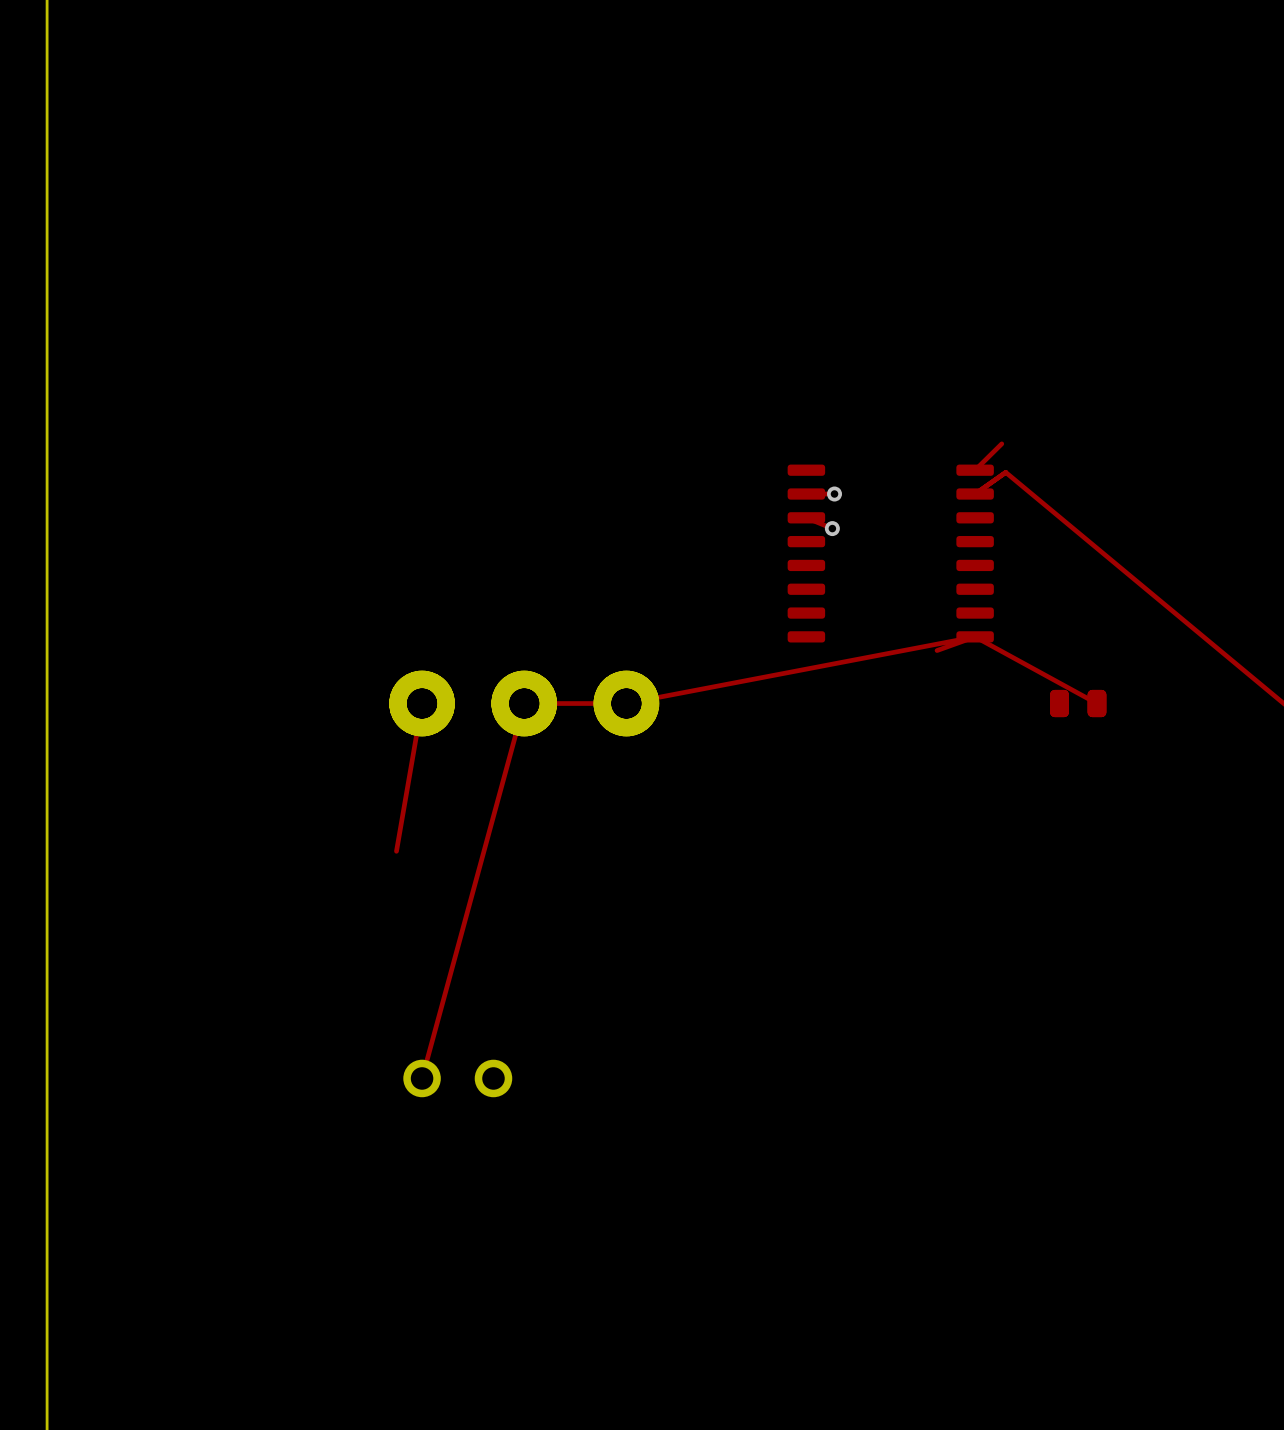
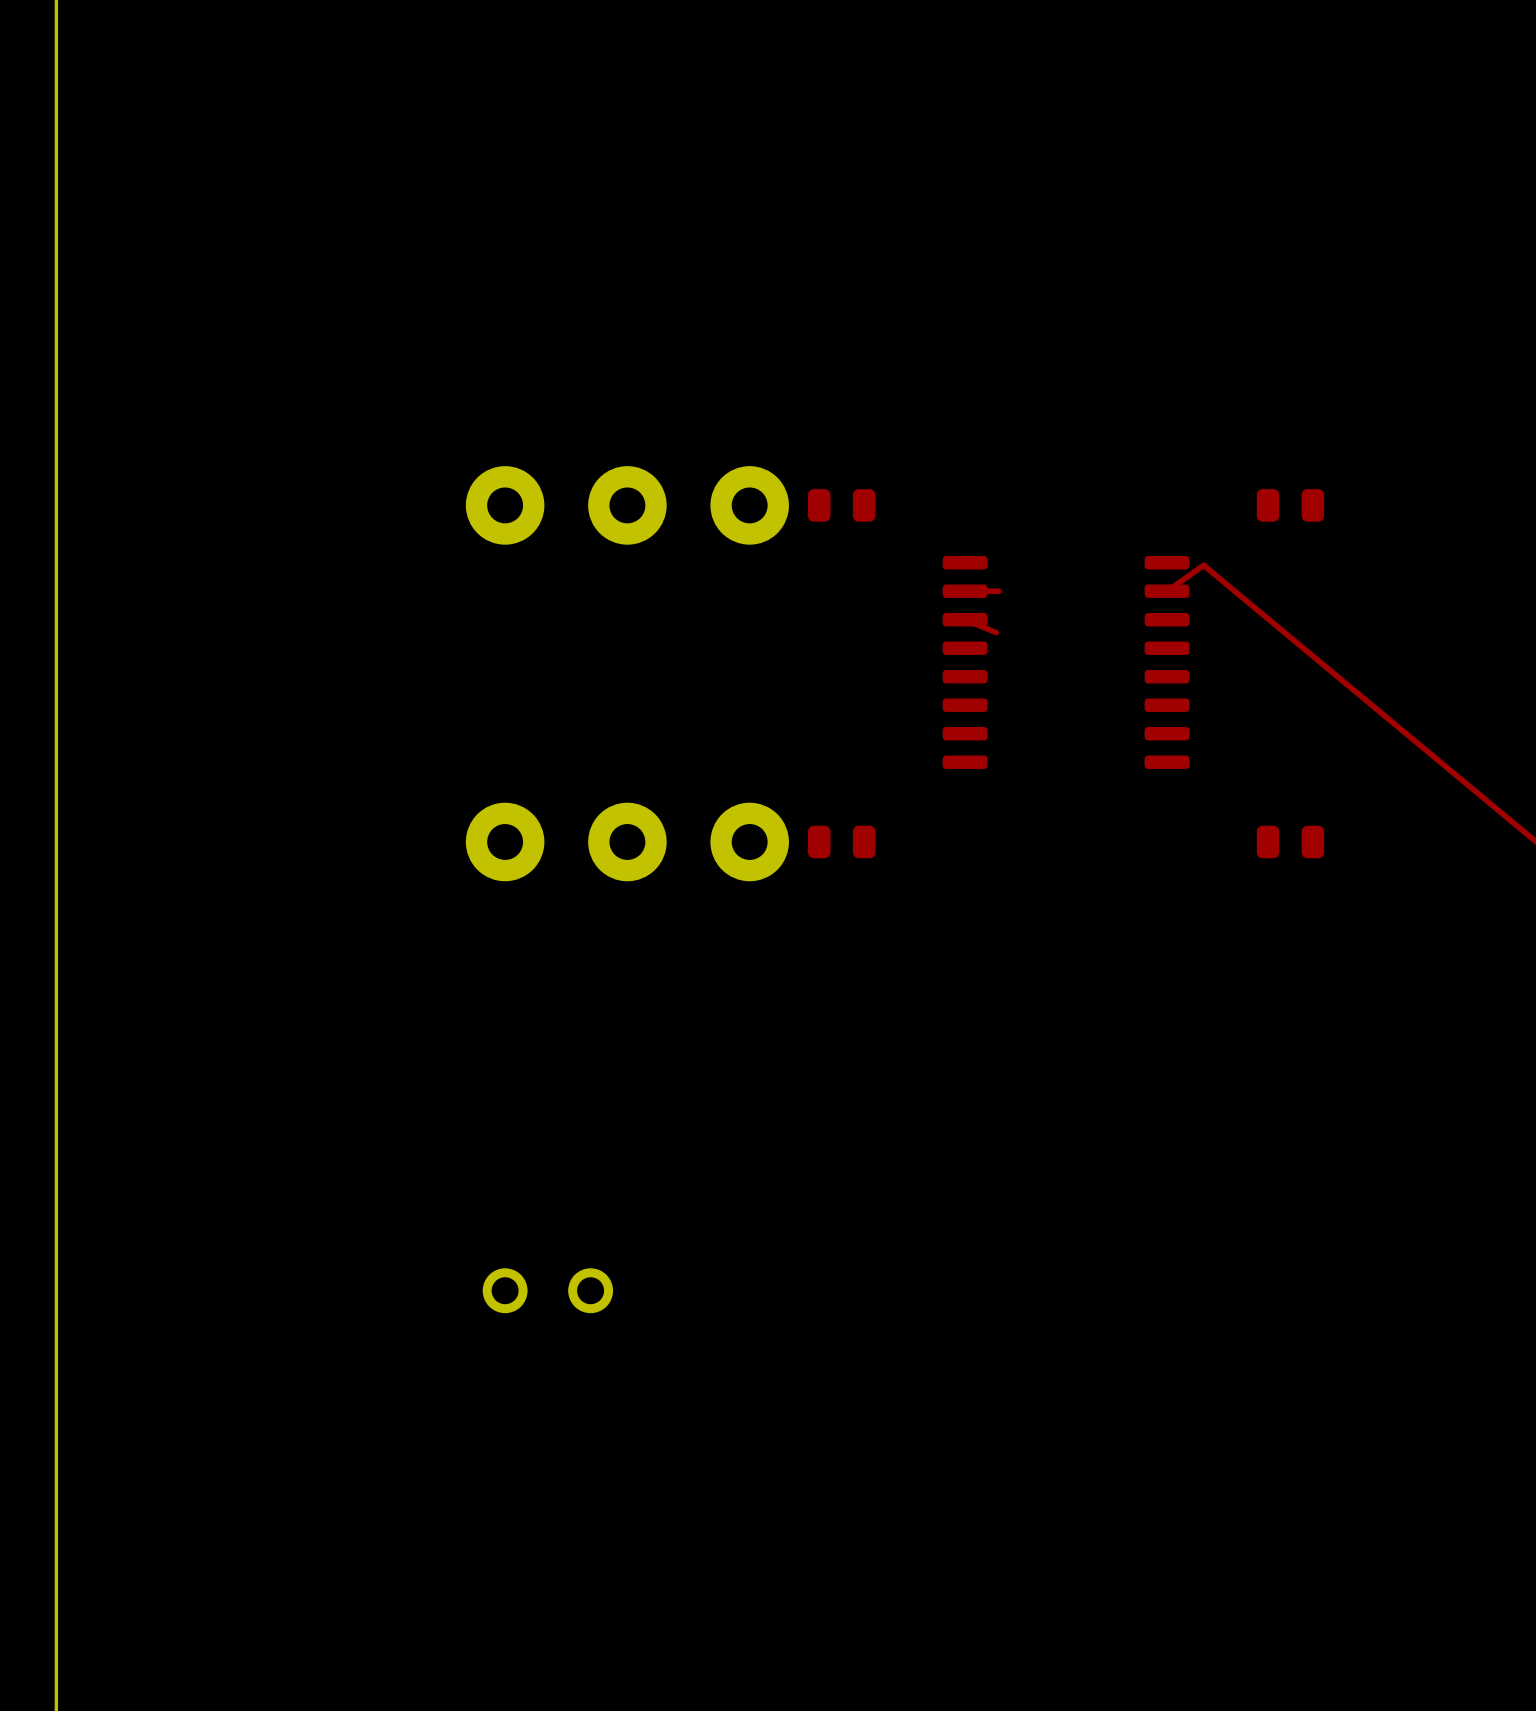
part: none -> (627, 505)
part: none -> (841, 505)
part: none -> (1290, 505)
track: (1001, 443) (975, 470) -> none
via: (834, 494) -> none
via: (832, 528) -> none
track: (975, 636) (626, 703) (524, 703) (422, 1078) -> none
track: (975, 636) (1096, 703) -> none
track: (975, 636) (937, 650) -> none
track: (422, 703) (396, 851) -> none
part: none -> (841, 841)

